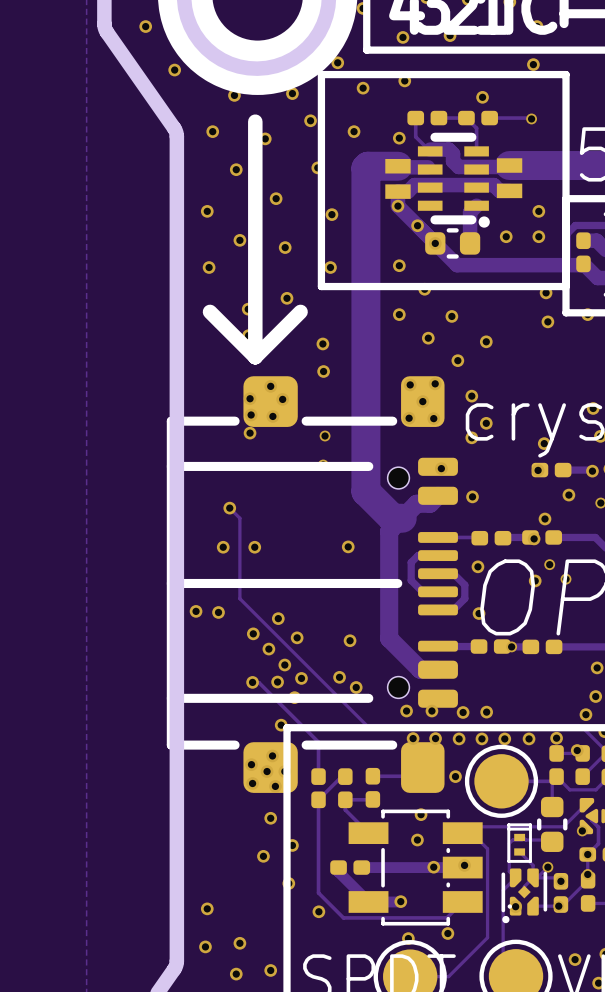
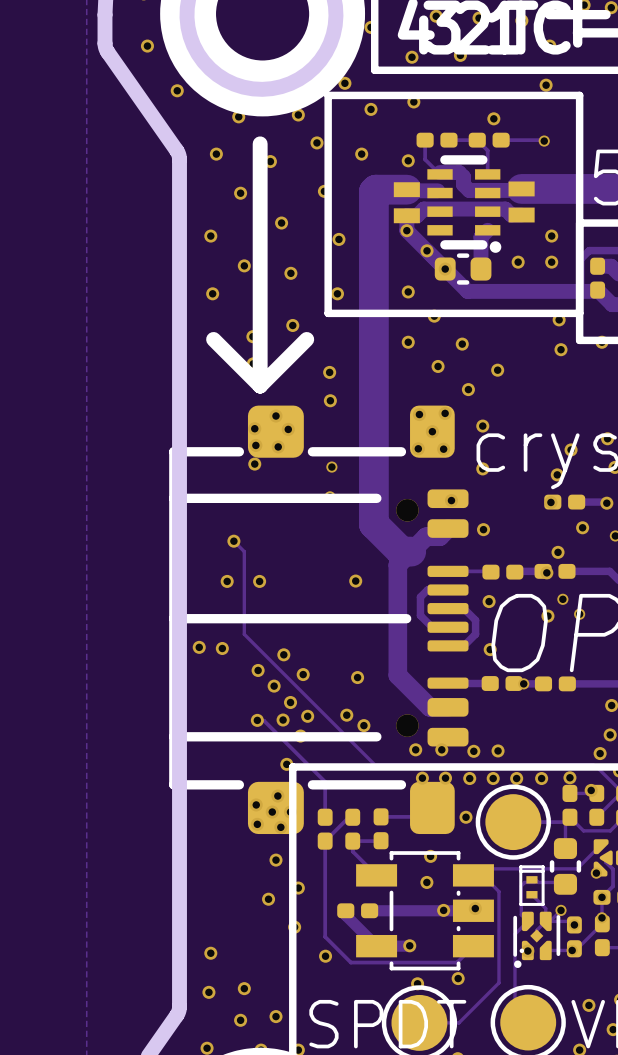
part footprint: [166, 376, 458, 793] -> [169, 405, 469, 835]
via position: (486, 423) -> (571, 449)

